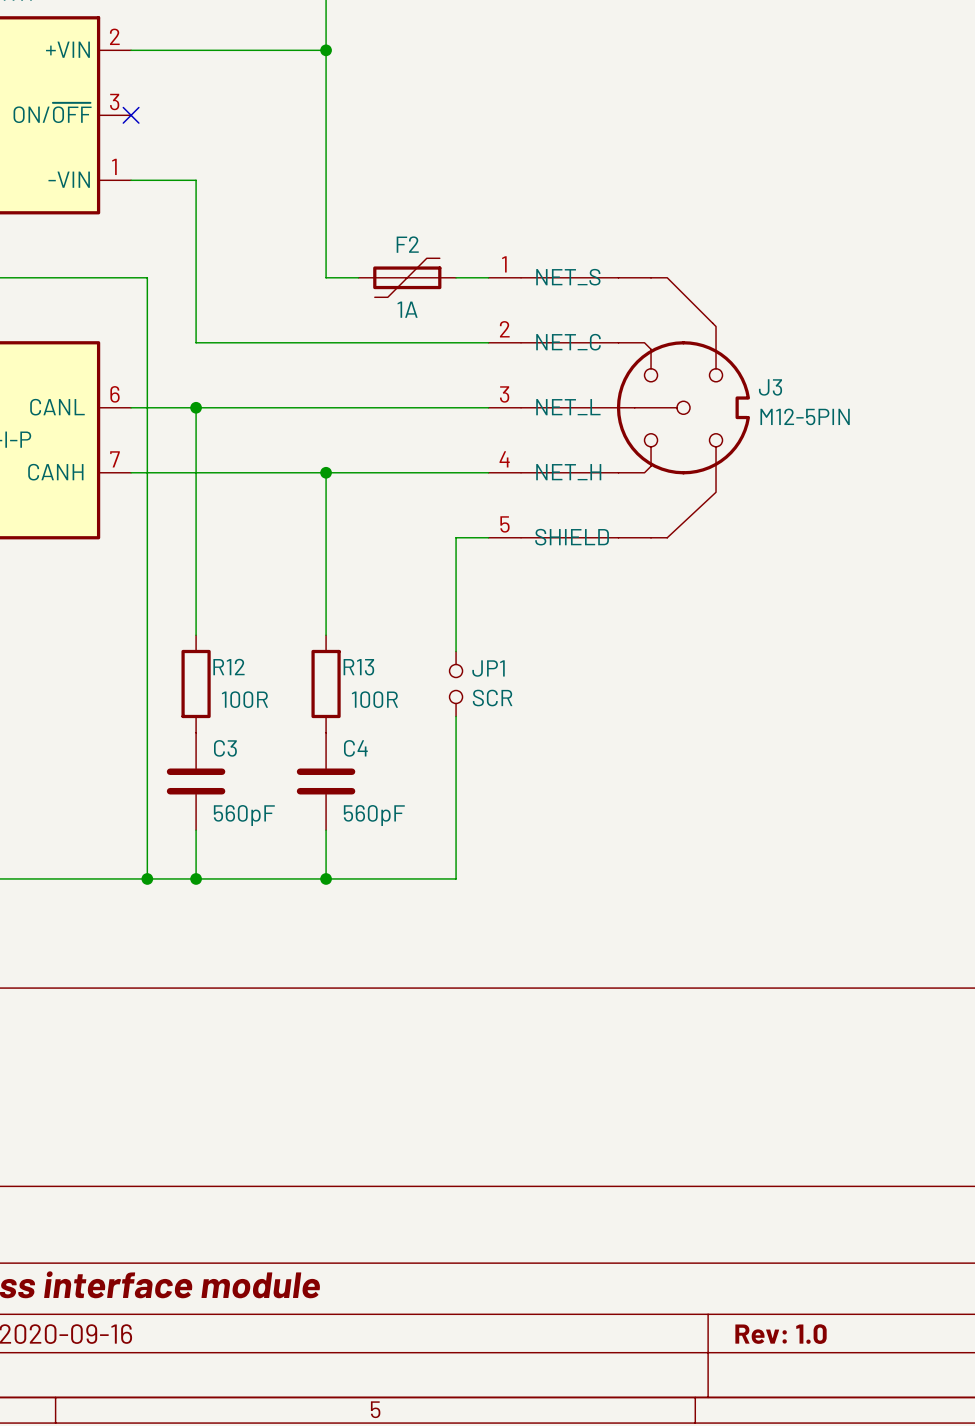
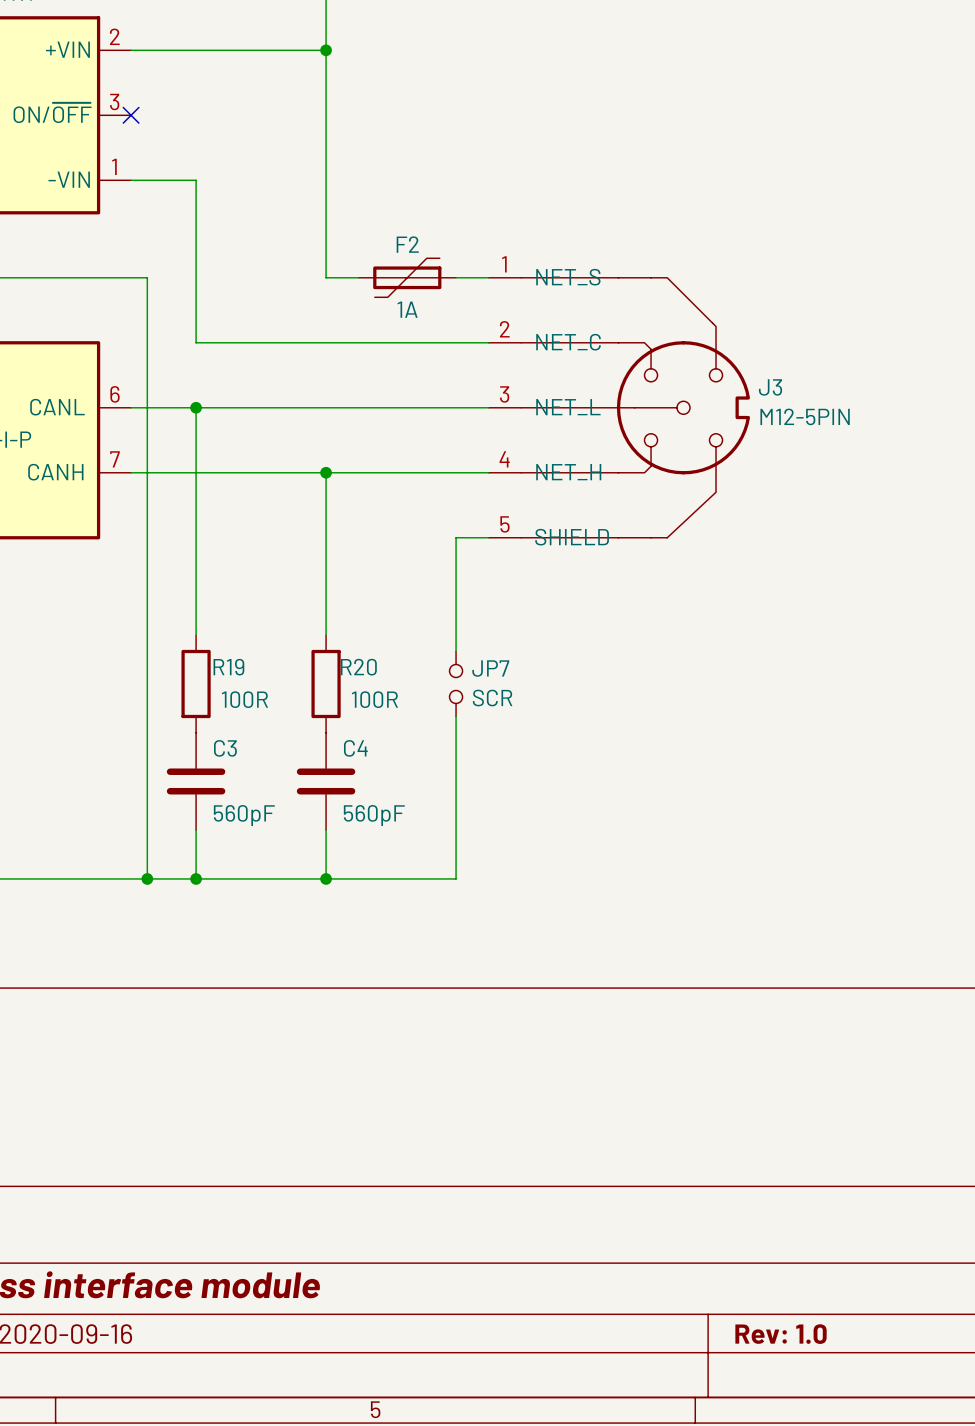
R12 name: R12 (228, 667) -> R19 (228, 667)
R13 name: R13 (358, 667) -> R20 (358, 667)
JP1 name: JP1 (488, 668) -> JP7 (490, 668)

